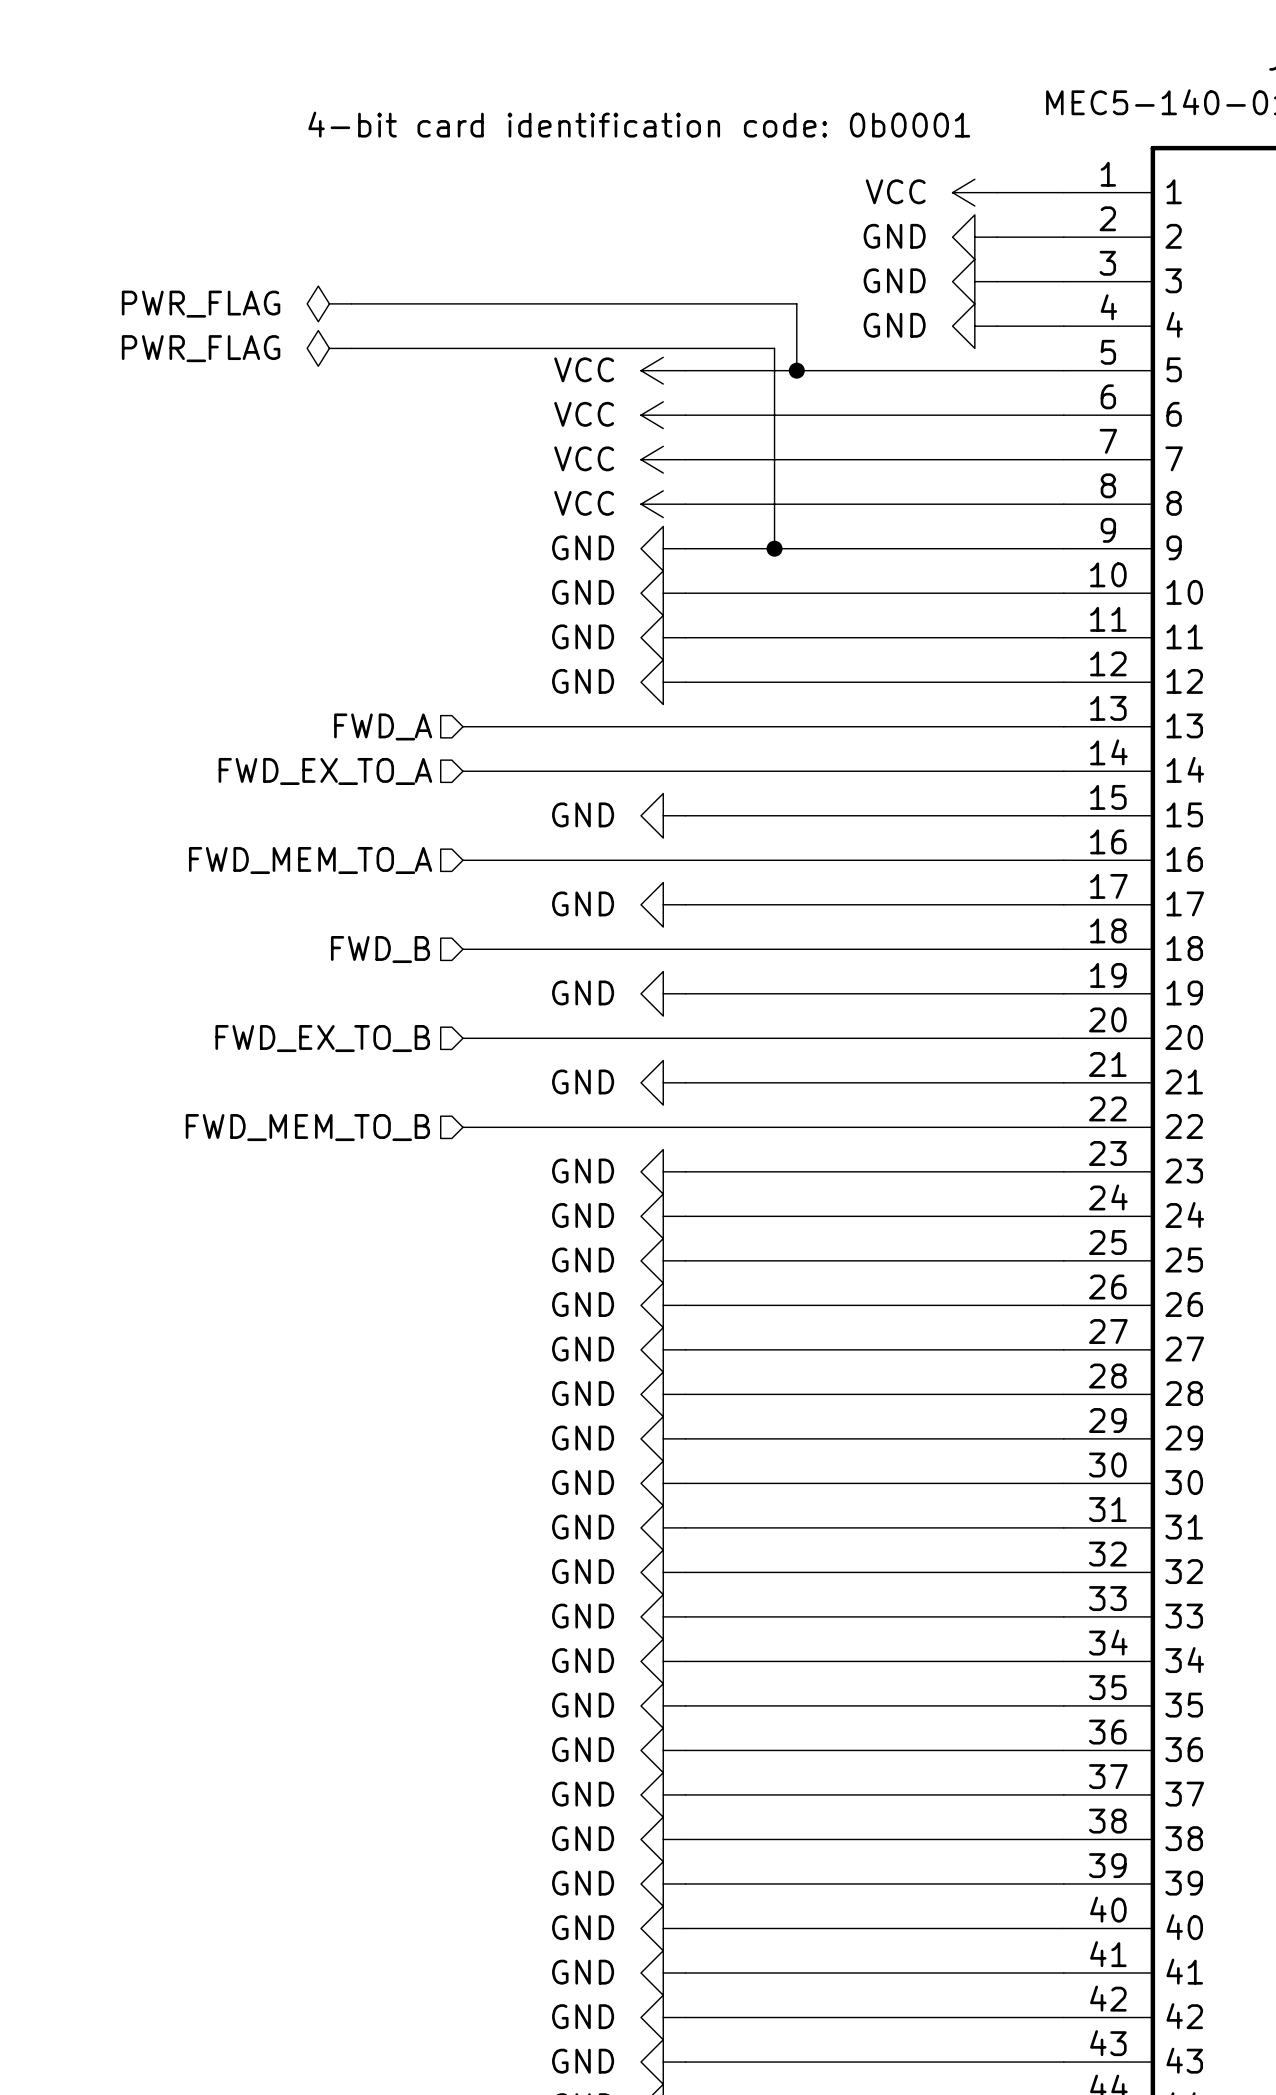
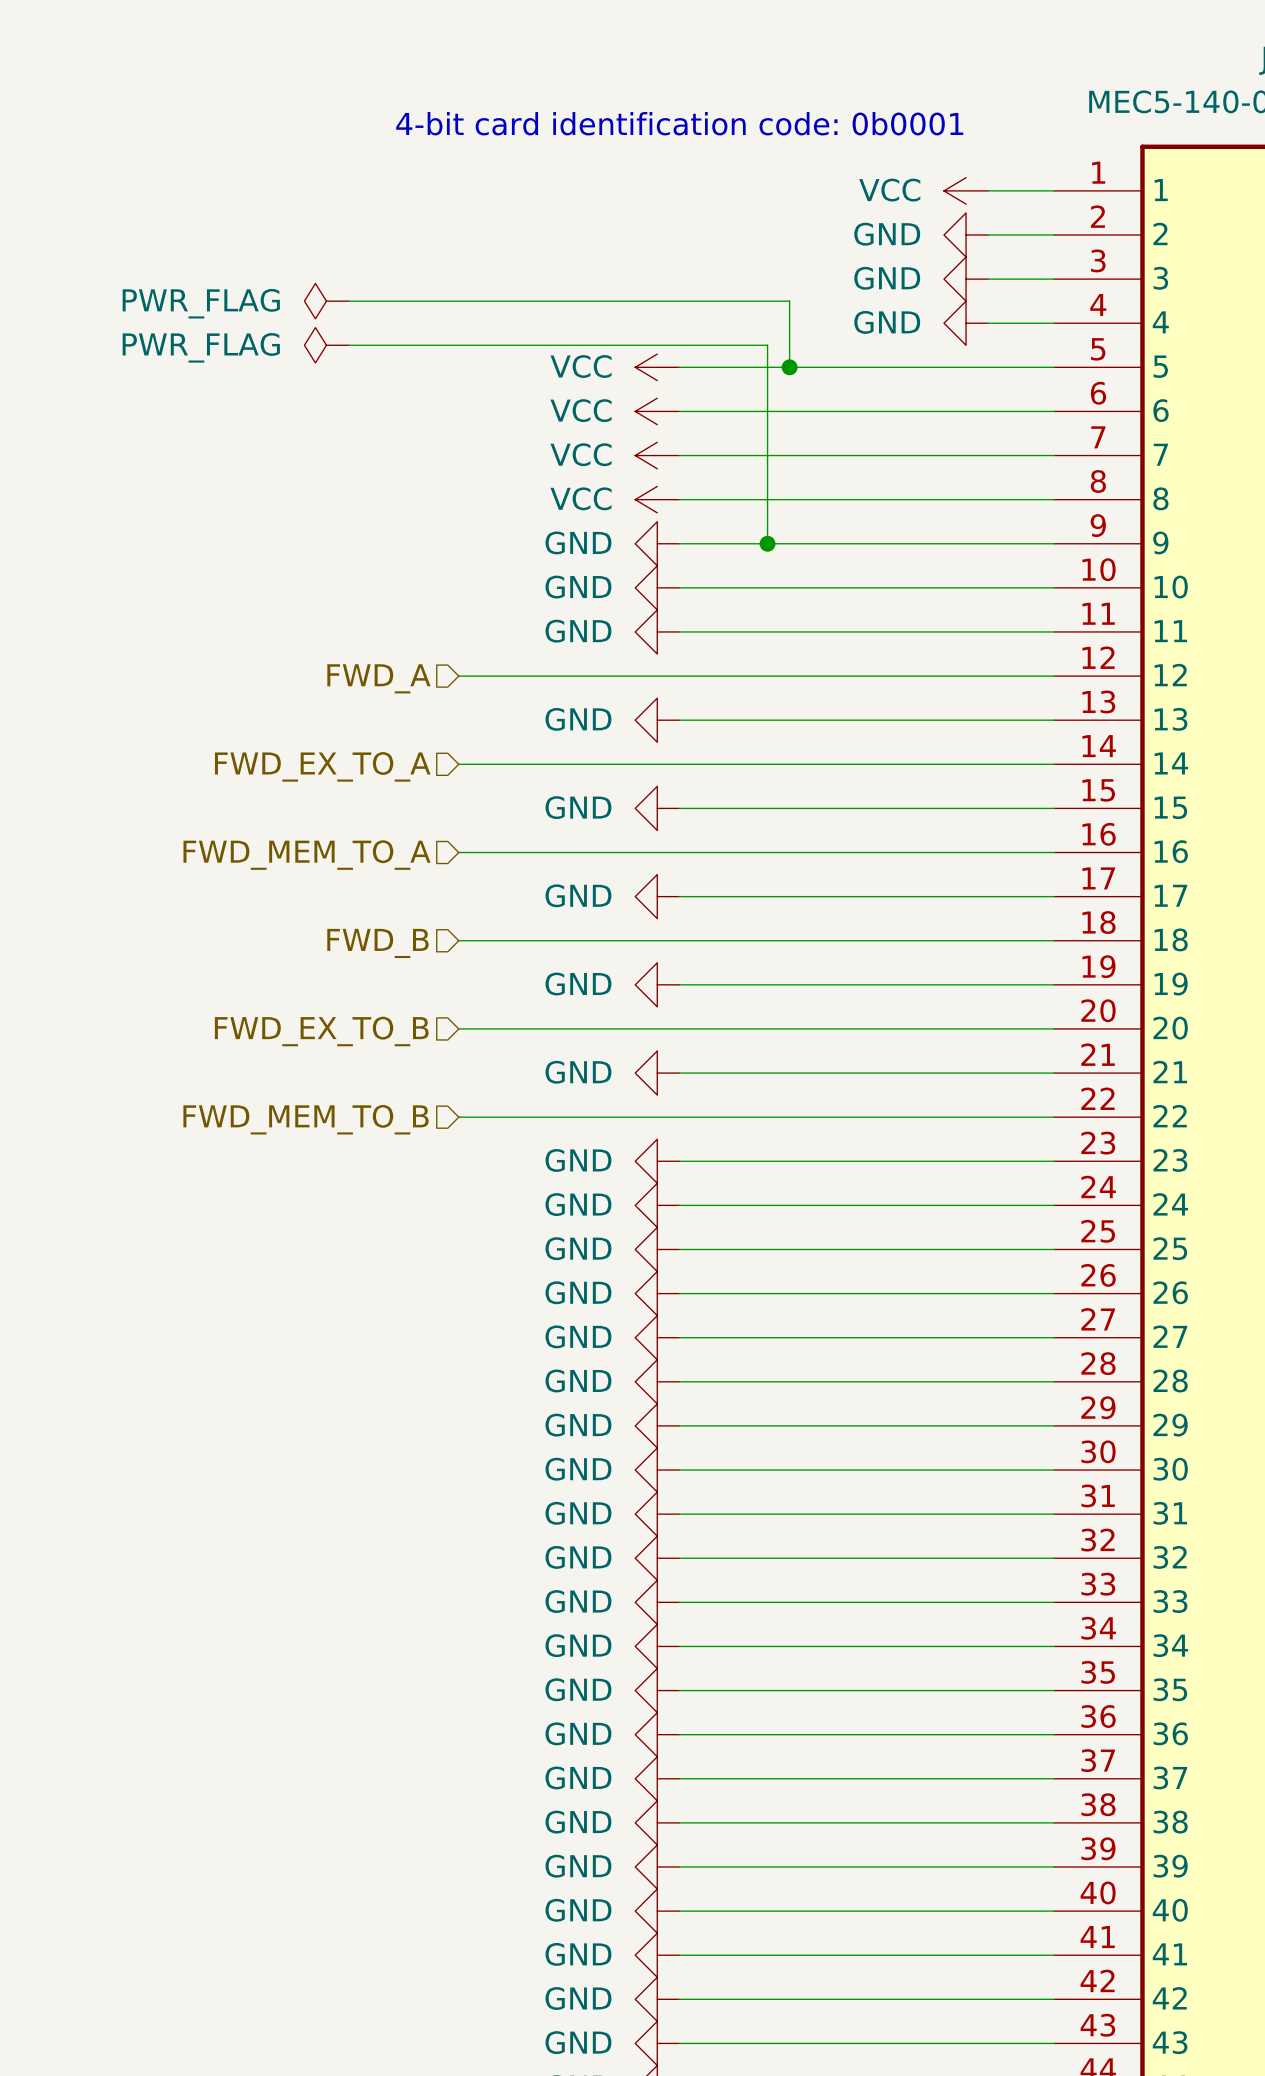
power symbol position: GND (663, 682) -> GND (657, 720)
hierarchical label position: FWD_A (383, 726) -> FWD_A (378, 678)
wire: (462, 726) (685, 726) -> (458, 676) (679, 676)

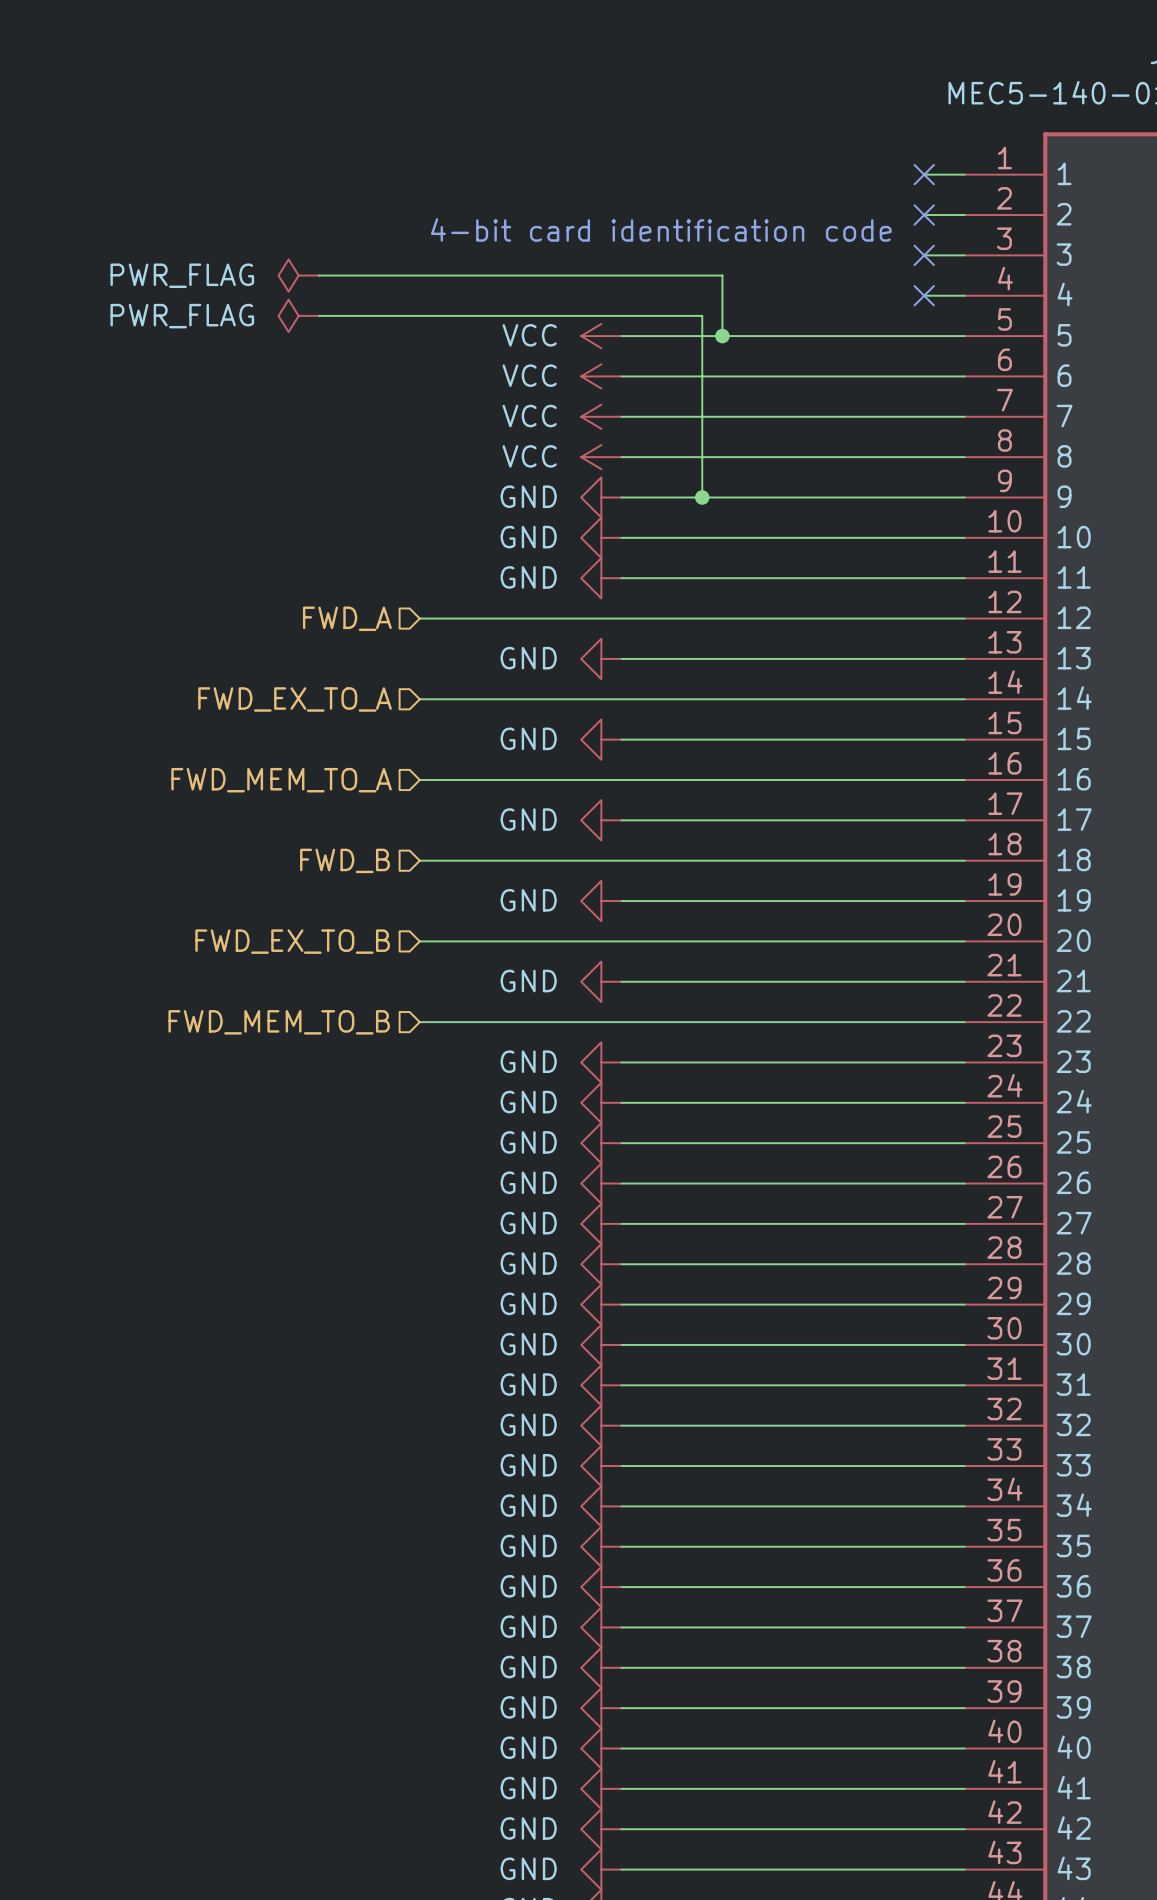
text: 4-bit card identification code: 0b0001 (679, 123) -> none
power symbol: VCC (966, 190) -> none
wire: (988, 190) (1010, 190) -> none
no-connect mark: none -> (924, 174)
power symbol: GND (966, 235) -> none
wire: (988, 235) (1010, 235) -> none
no-connect mark: none -> (924, 215)
text: none -> 4-bit card identification code (661, 229)
power symbol: GND (966, 279) -> none
wire: (988, 279) (1010, 279) -> none
no-connect mark: none -> (924, 255)
power symbol: GND (966, 323) -> none
wire: (988, 323) (1010, 323) -> none
no-connect mark: none -> (924, 295)

